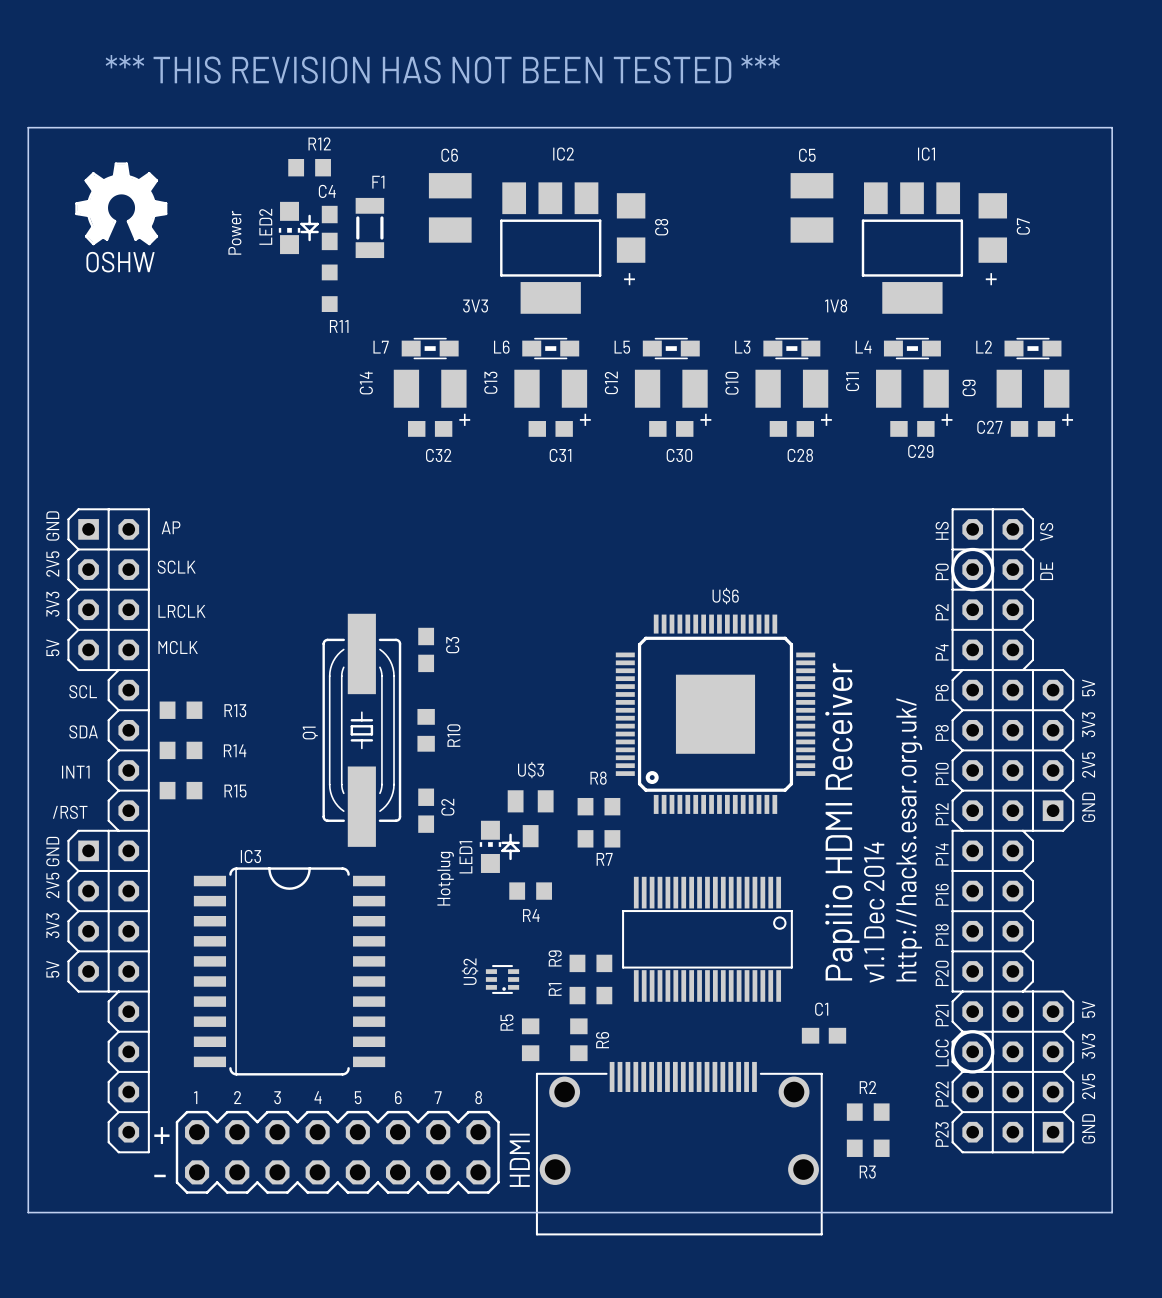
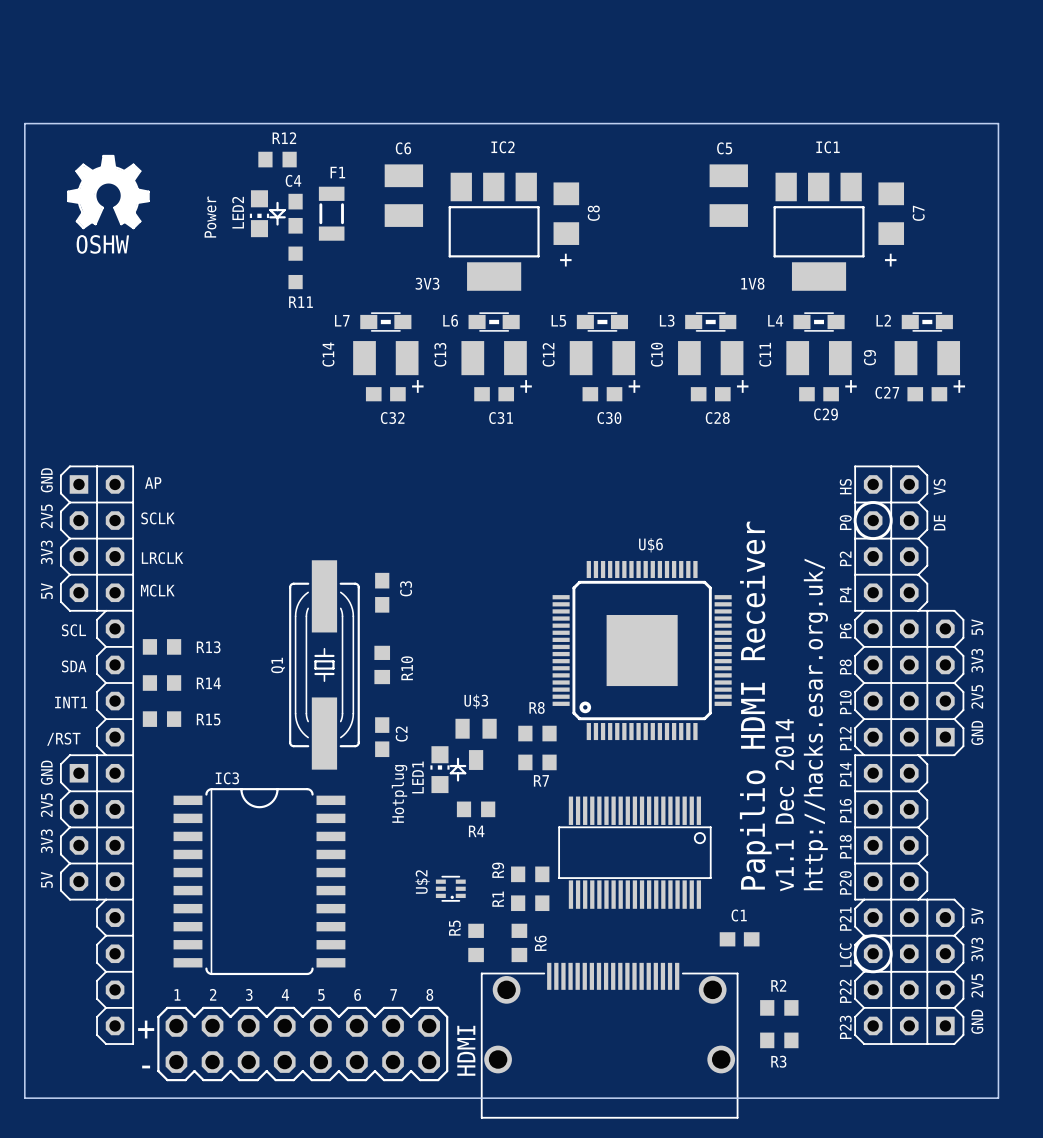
text: *** THIS REVISION HAS NOT BEEN TESTED *** (442, 69) -> none

